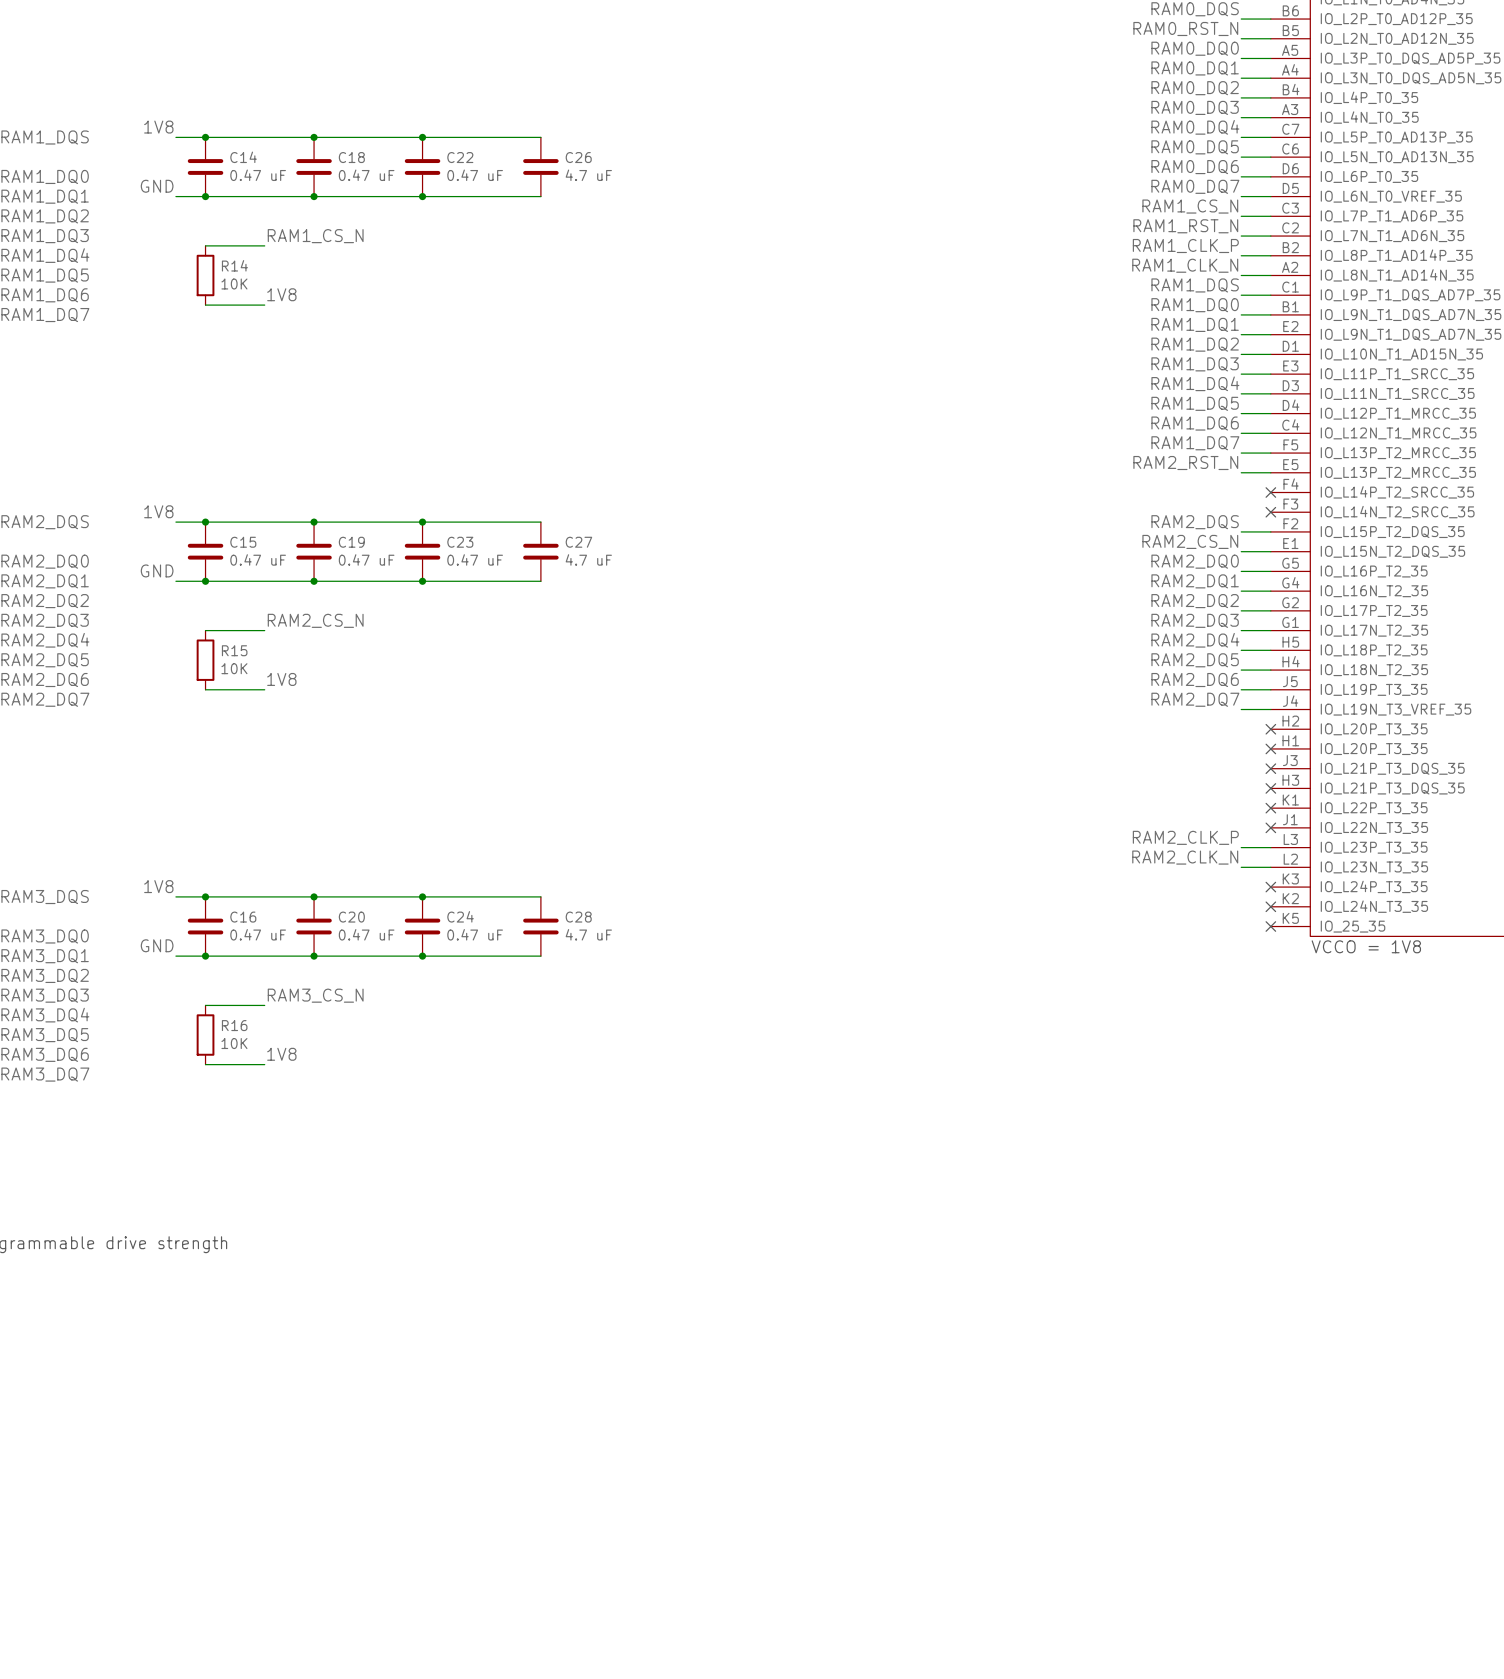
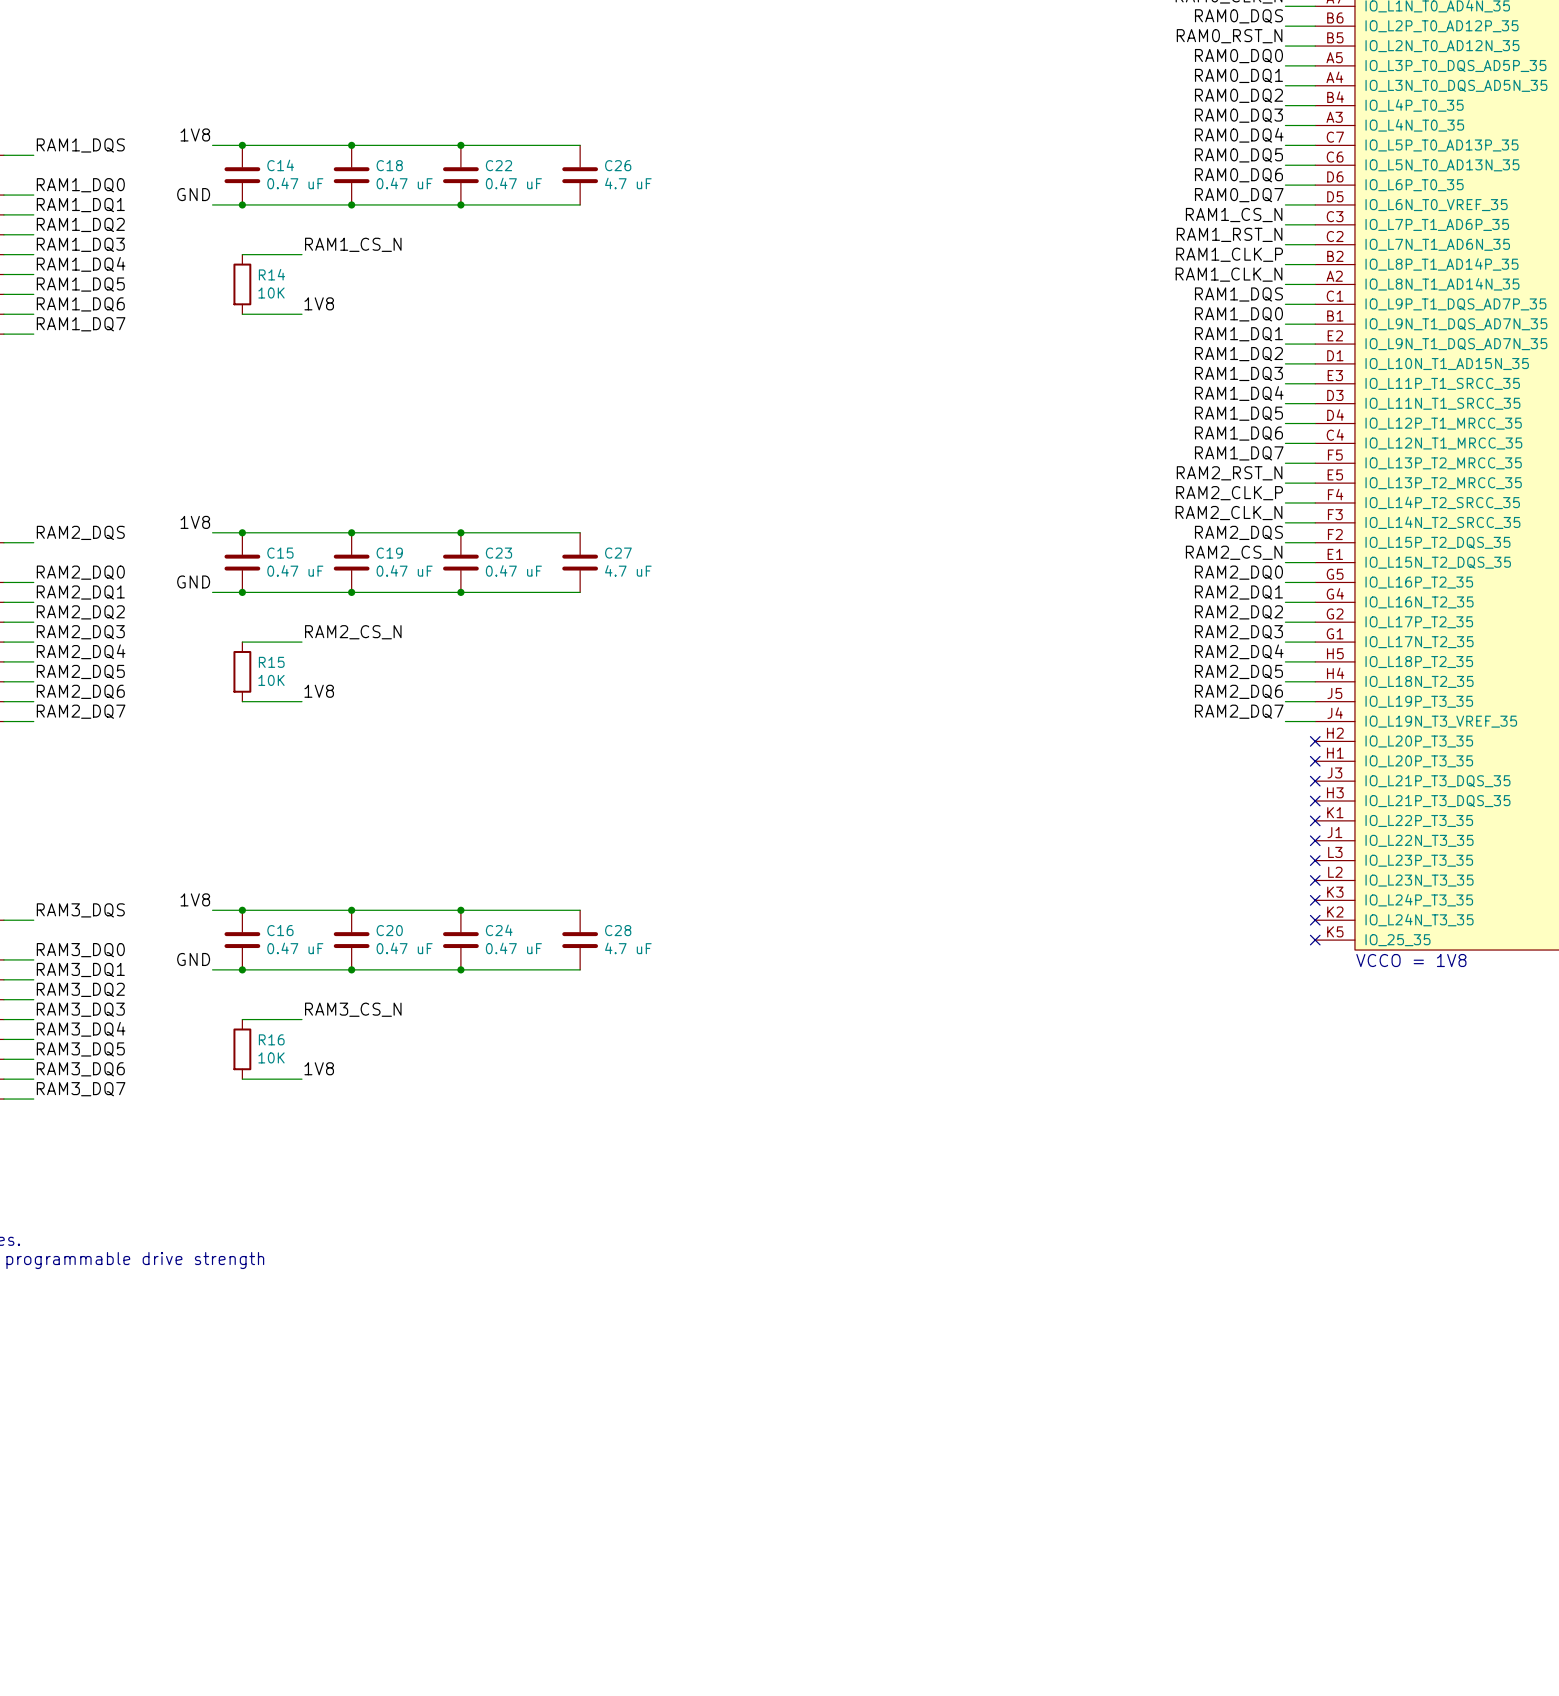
label: none -> RAM2_CLK_P (1229, 493)
wire: none -> (1285, 502) (1315, 502)
no-connect mark: (1270, 492) -> none
label: none -> RAM2_CLK_N (1229, 513)
wire: none -> (1285, 522) (1315, 522)
no-connect mark: (1270, 512) -> none
label: RAM2_CLK_P (1185, 837) -> none
wire: (1241, 847) (1270, 847) -> none
no-connect mark: none -> (1315, 860)
label: RAM2_CLK_N (1185, 857) -> none
wire: (1241, 867) (1270, 867) -> none
no-connect mark: none -> (1315, 880)

